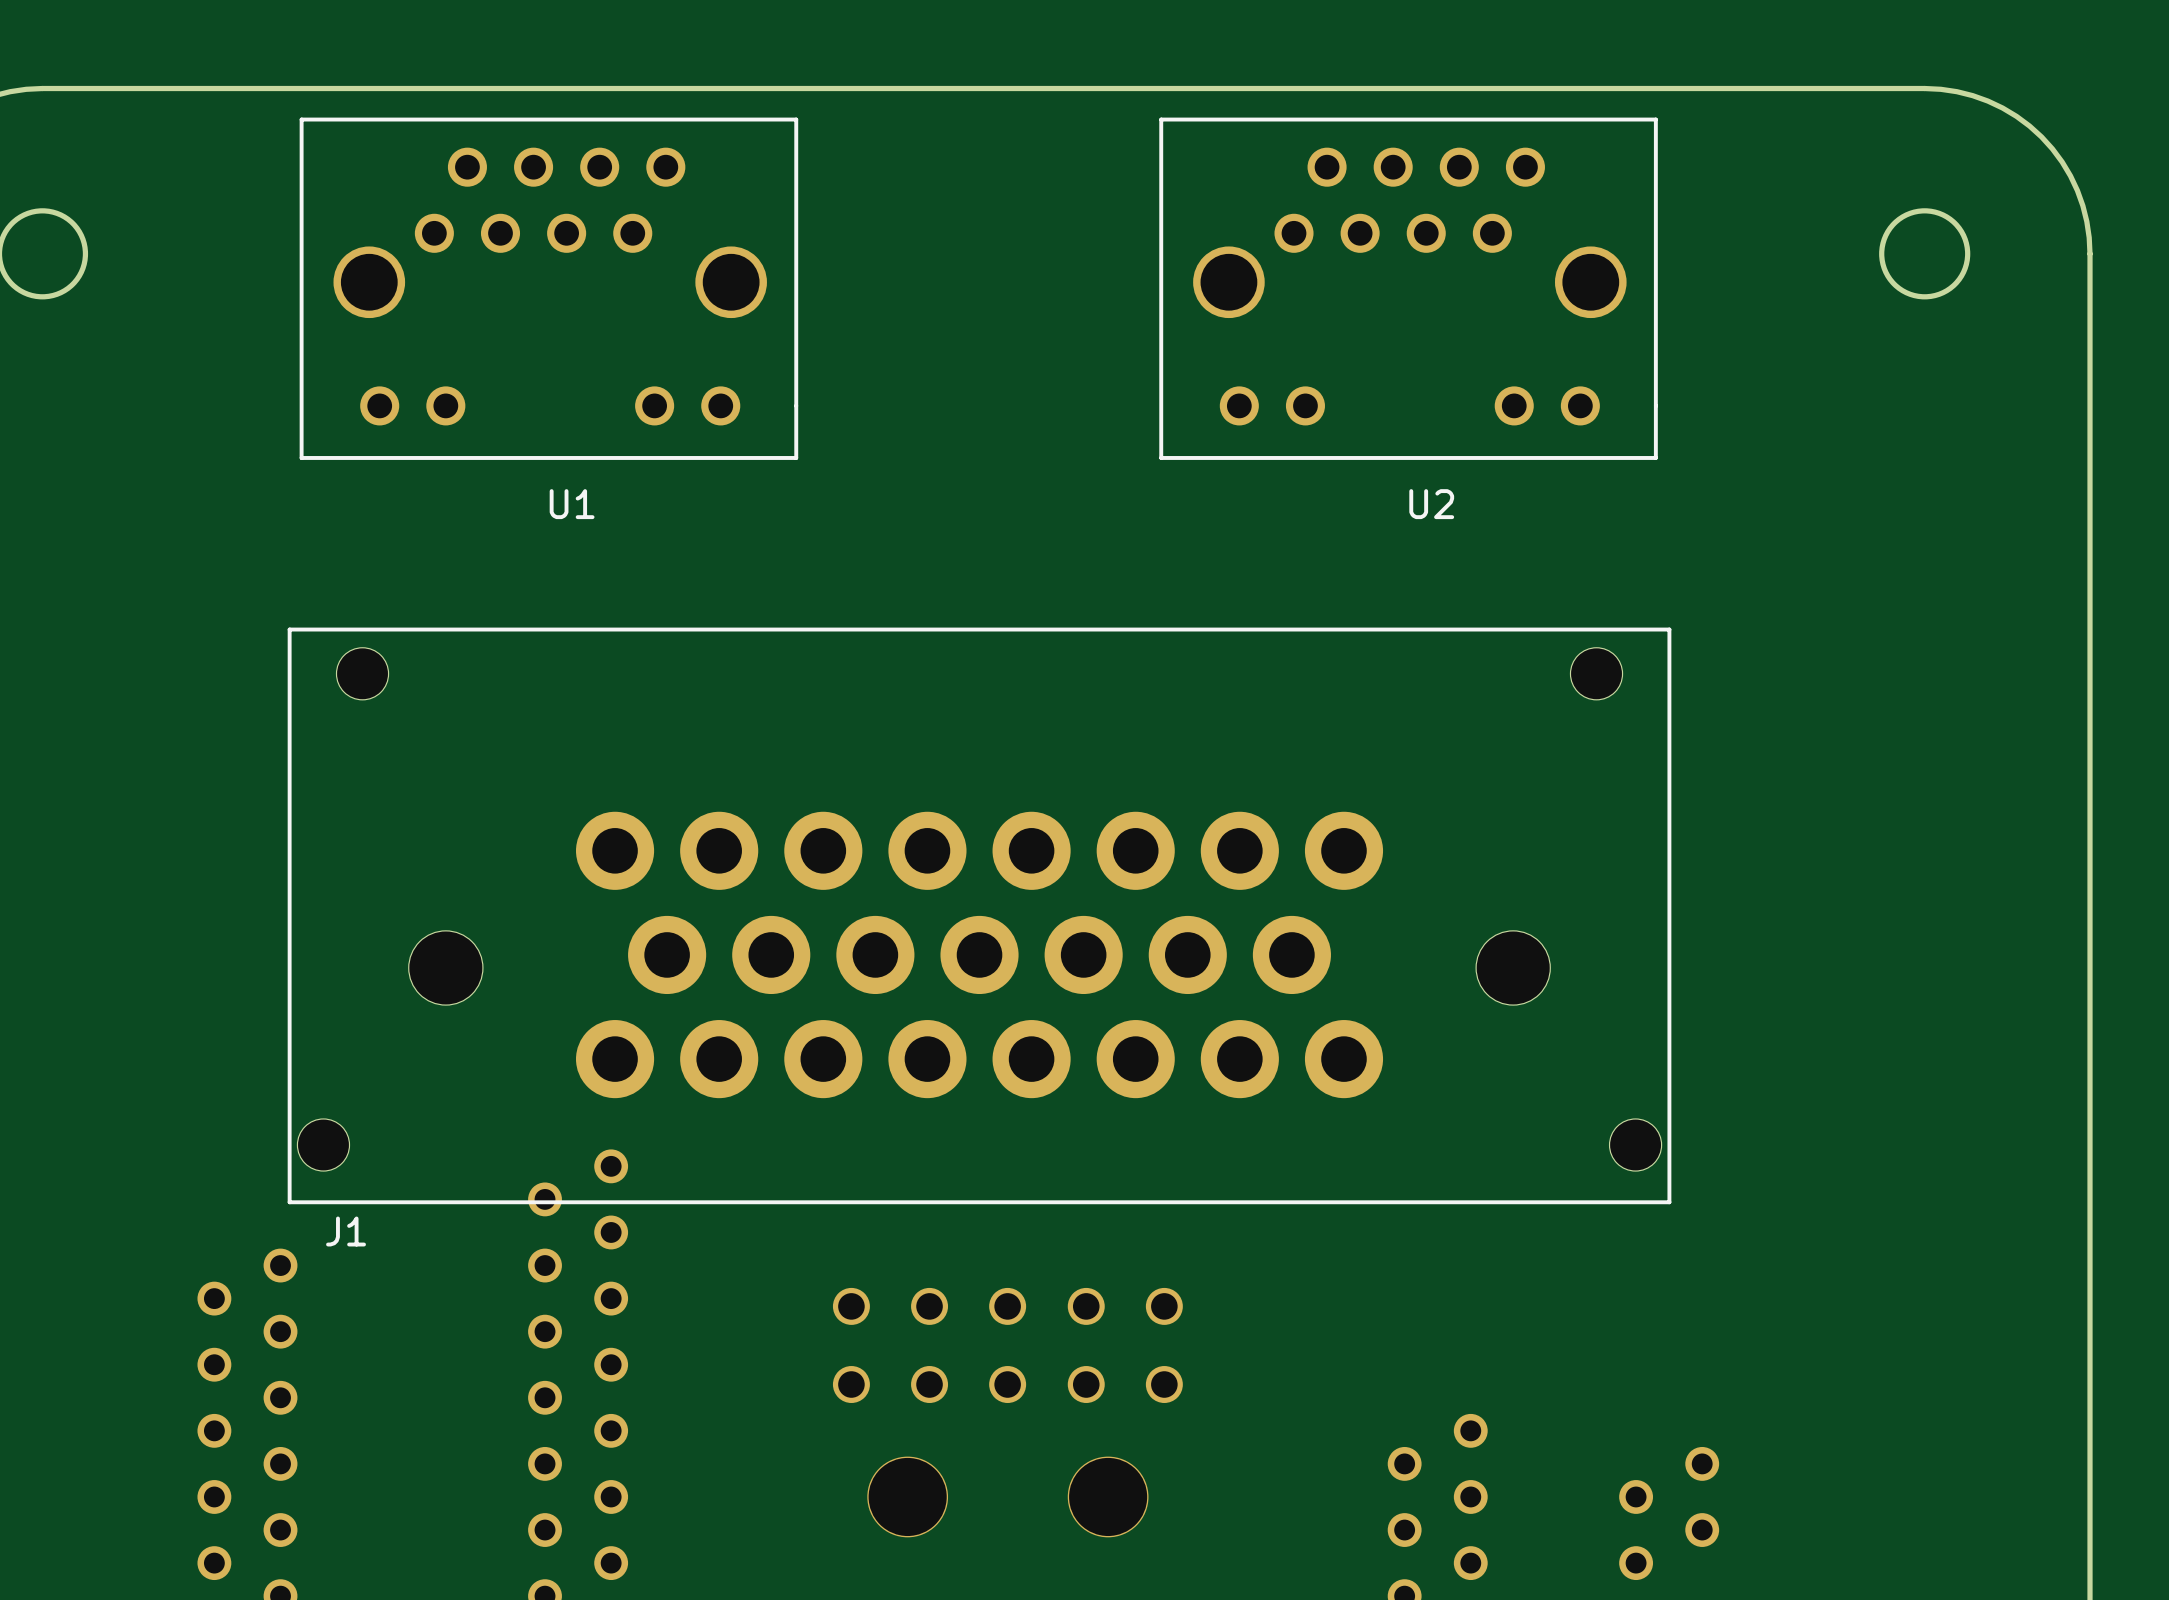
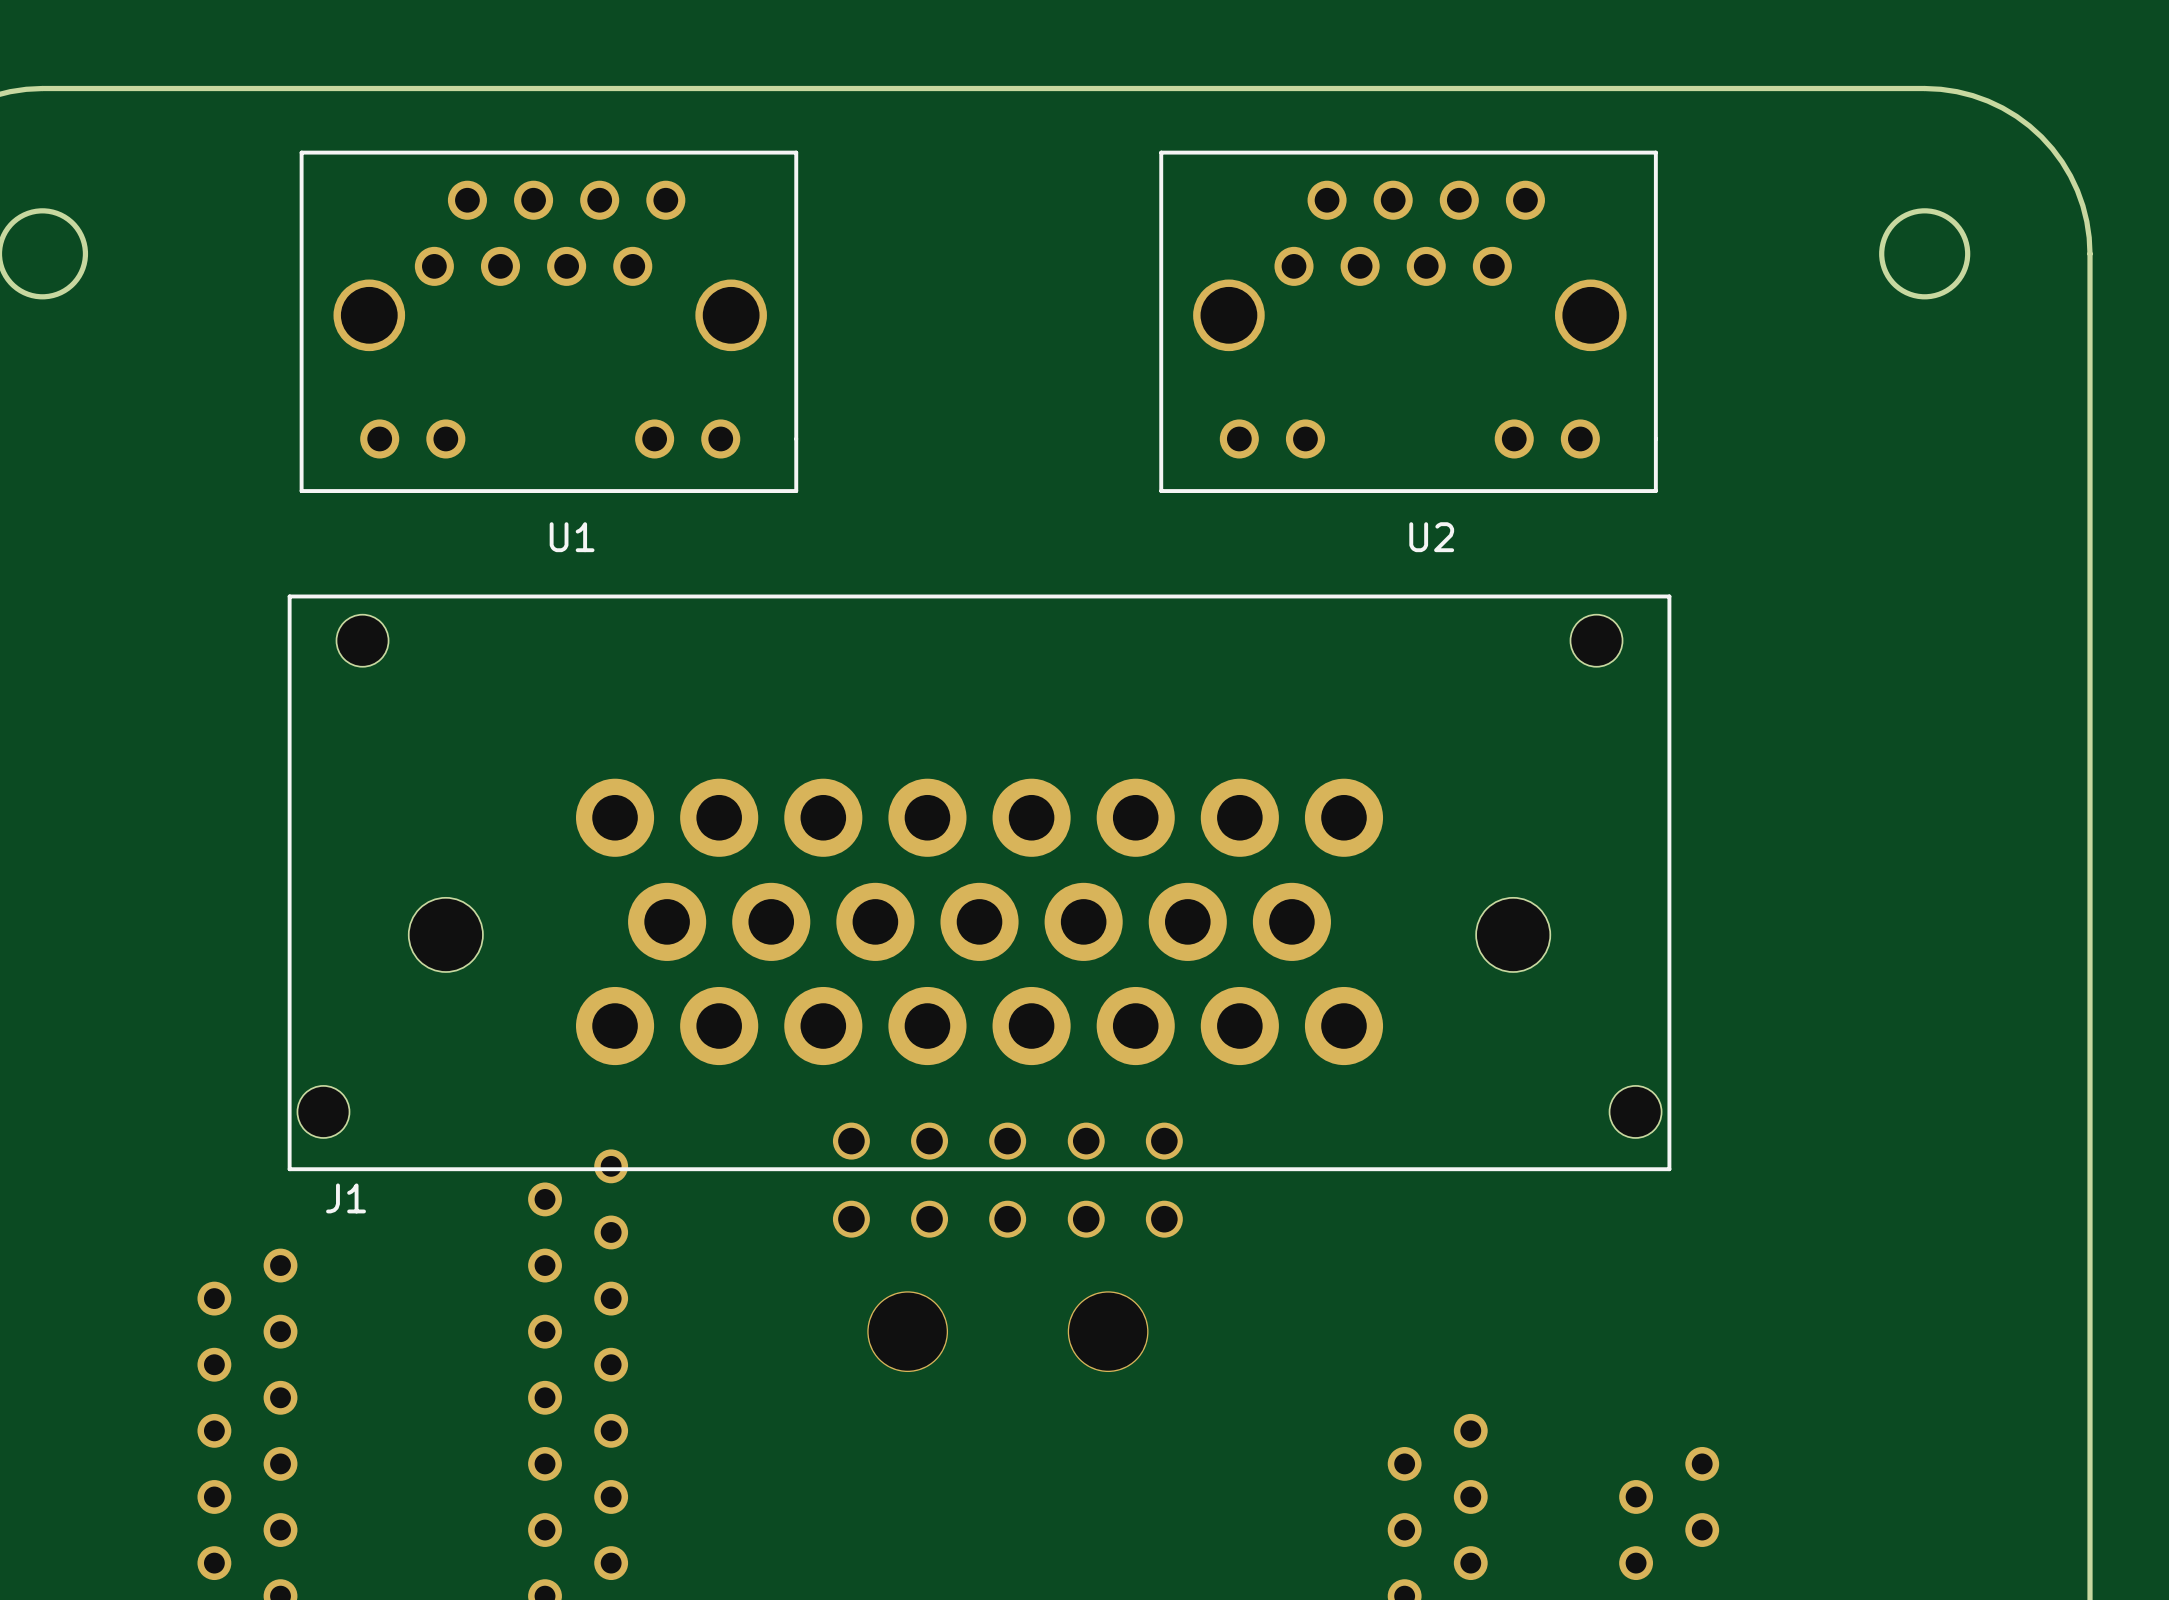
U1 position: (548, 288) -> (548, 321)
U2 position: (1408, 288) -> (1408, 321)
J1 position: (979, 915) -> (979, 882)
part position: (1007, 1412) -> (1007, 1247)

